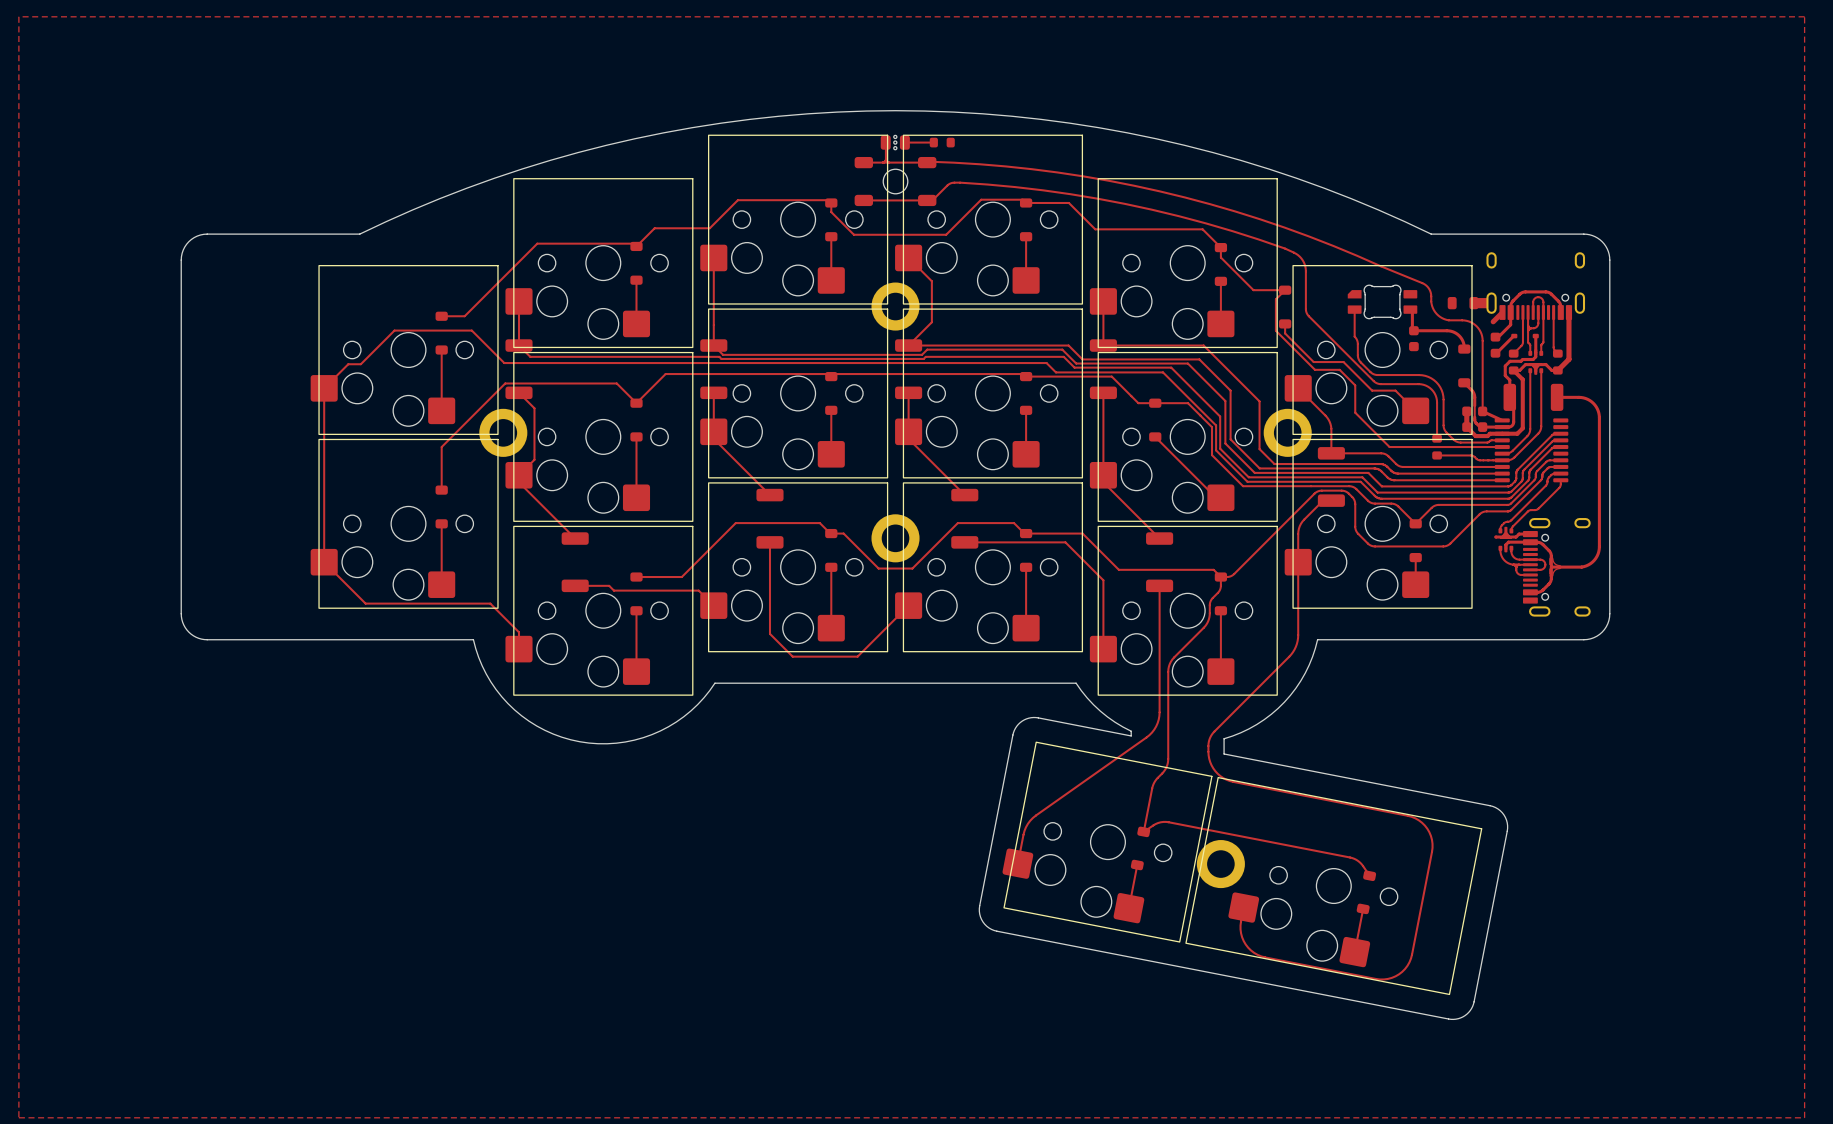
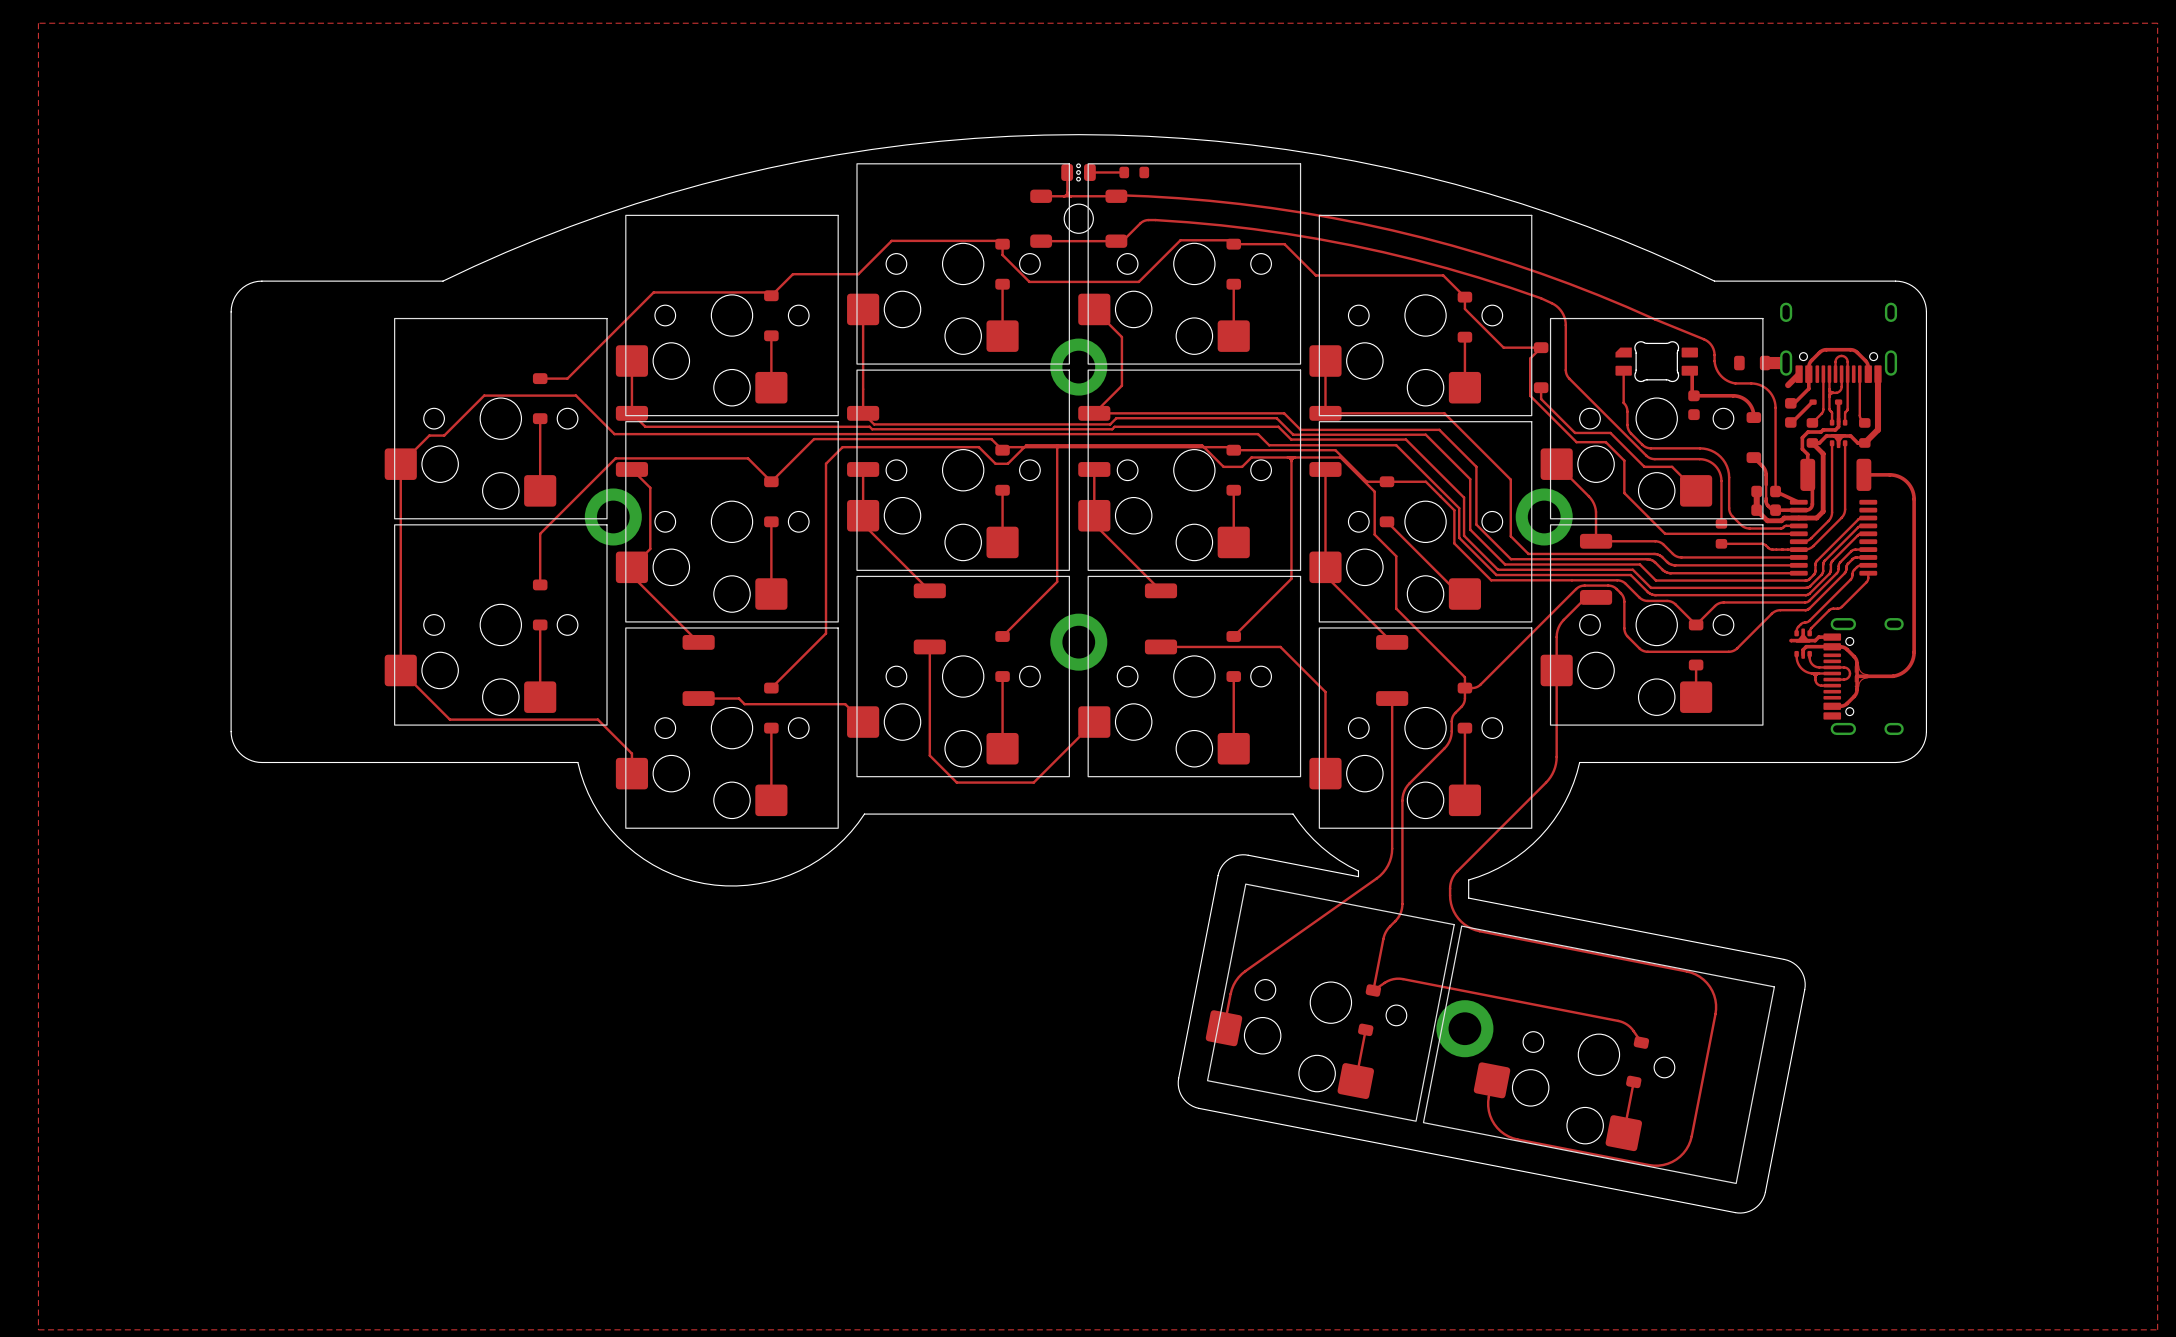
top track: (696, 374) (665, 374) -> (999, 447) (991, 439) (814, 439) (805, 447)
top track: (828, 374) (811, 374) -> (1464, 688) (1464, 677) (1396, 608) (1396, 556) (1374, 534) (1374, 491) (1340, 457) (1251, 457) (1242, 466) (1223, 466) (1202, 445) (1026, 445) (1007, 463) (995, 463) (978, 447)
top track: none -> (1295, 457) (1291, 461) (1287, 457)
top track: (830, 533) (819, 523) (735, 523) (681, 577) (636, 577) -> (842, 447) (826, 463) (826, 633) (771, 688)
top track: (1023, 533) (1014, 523) (957, 523) (912, 568) (878, 568) (843, 533) (831, 533) -> (1057, 445) (1057, 581) (1002, 636)
top track: (1026, 533) (1082, 533) (1118, 569) (1213, 569) (1220, 577) -> (1233, 636) (1291, 578) (1291, 457)

